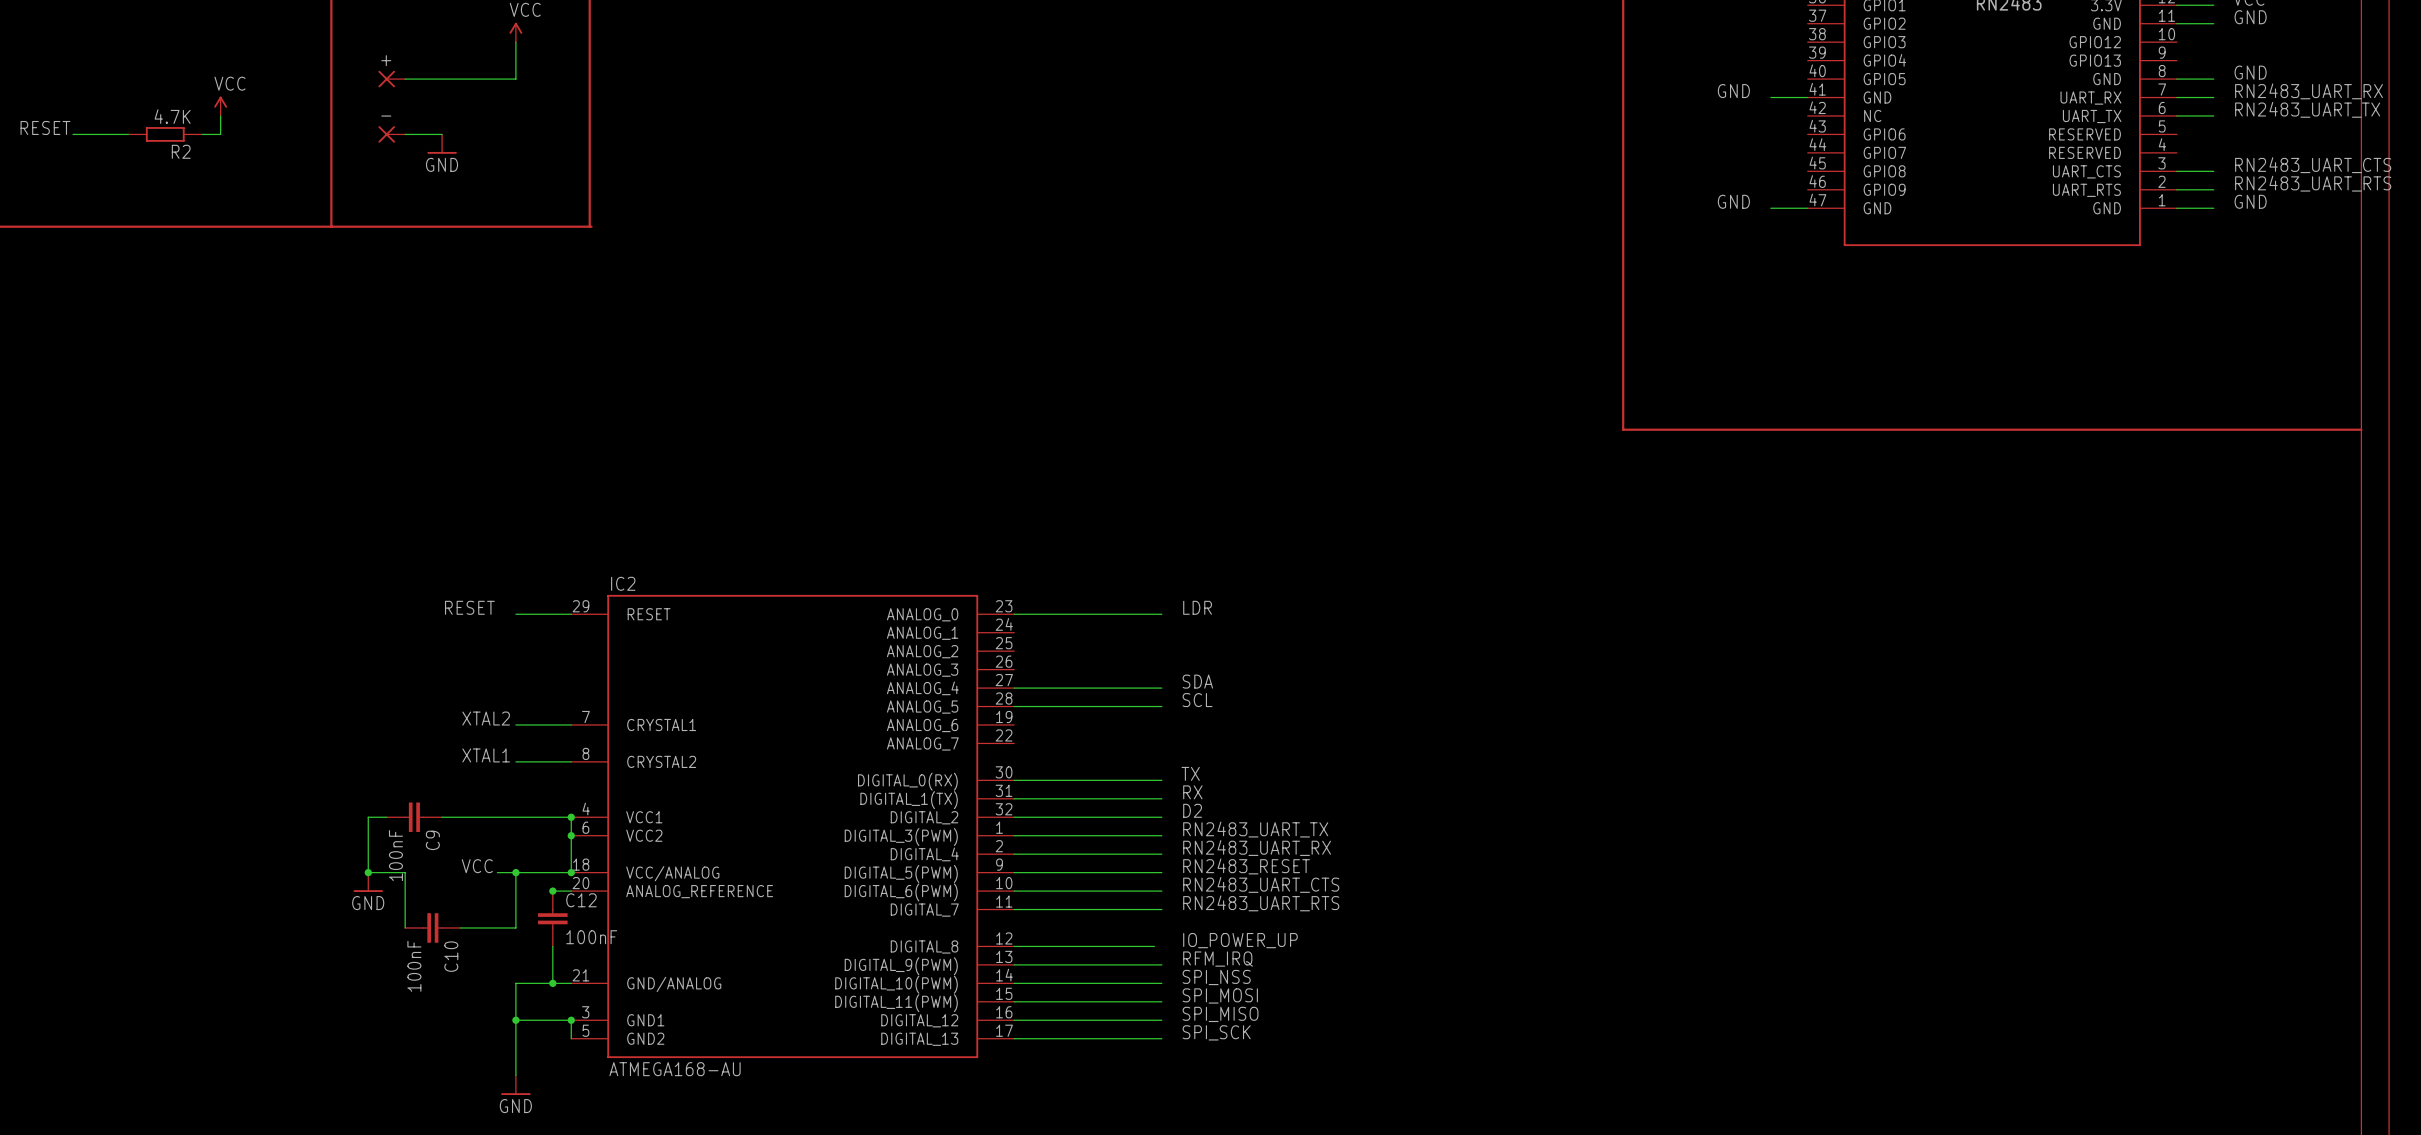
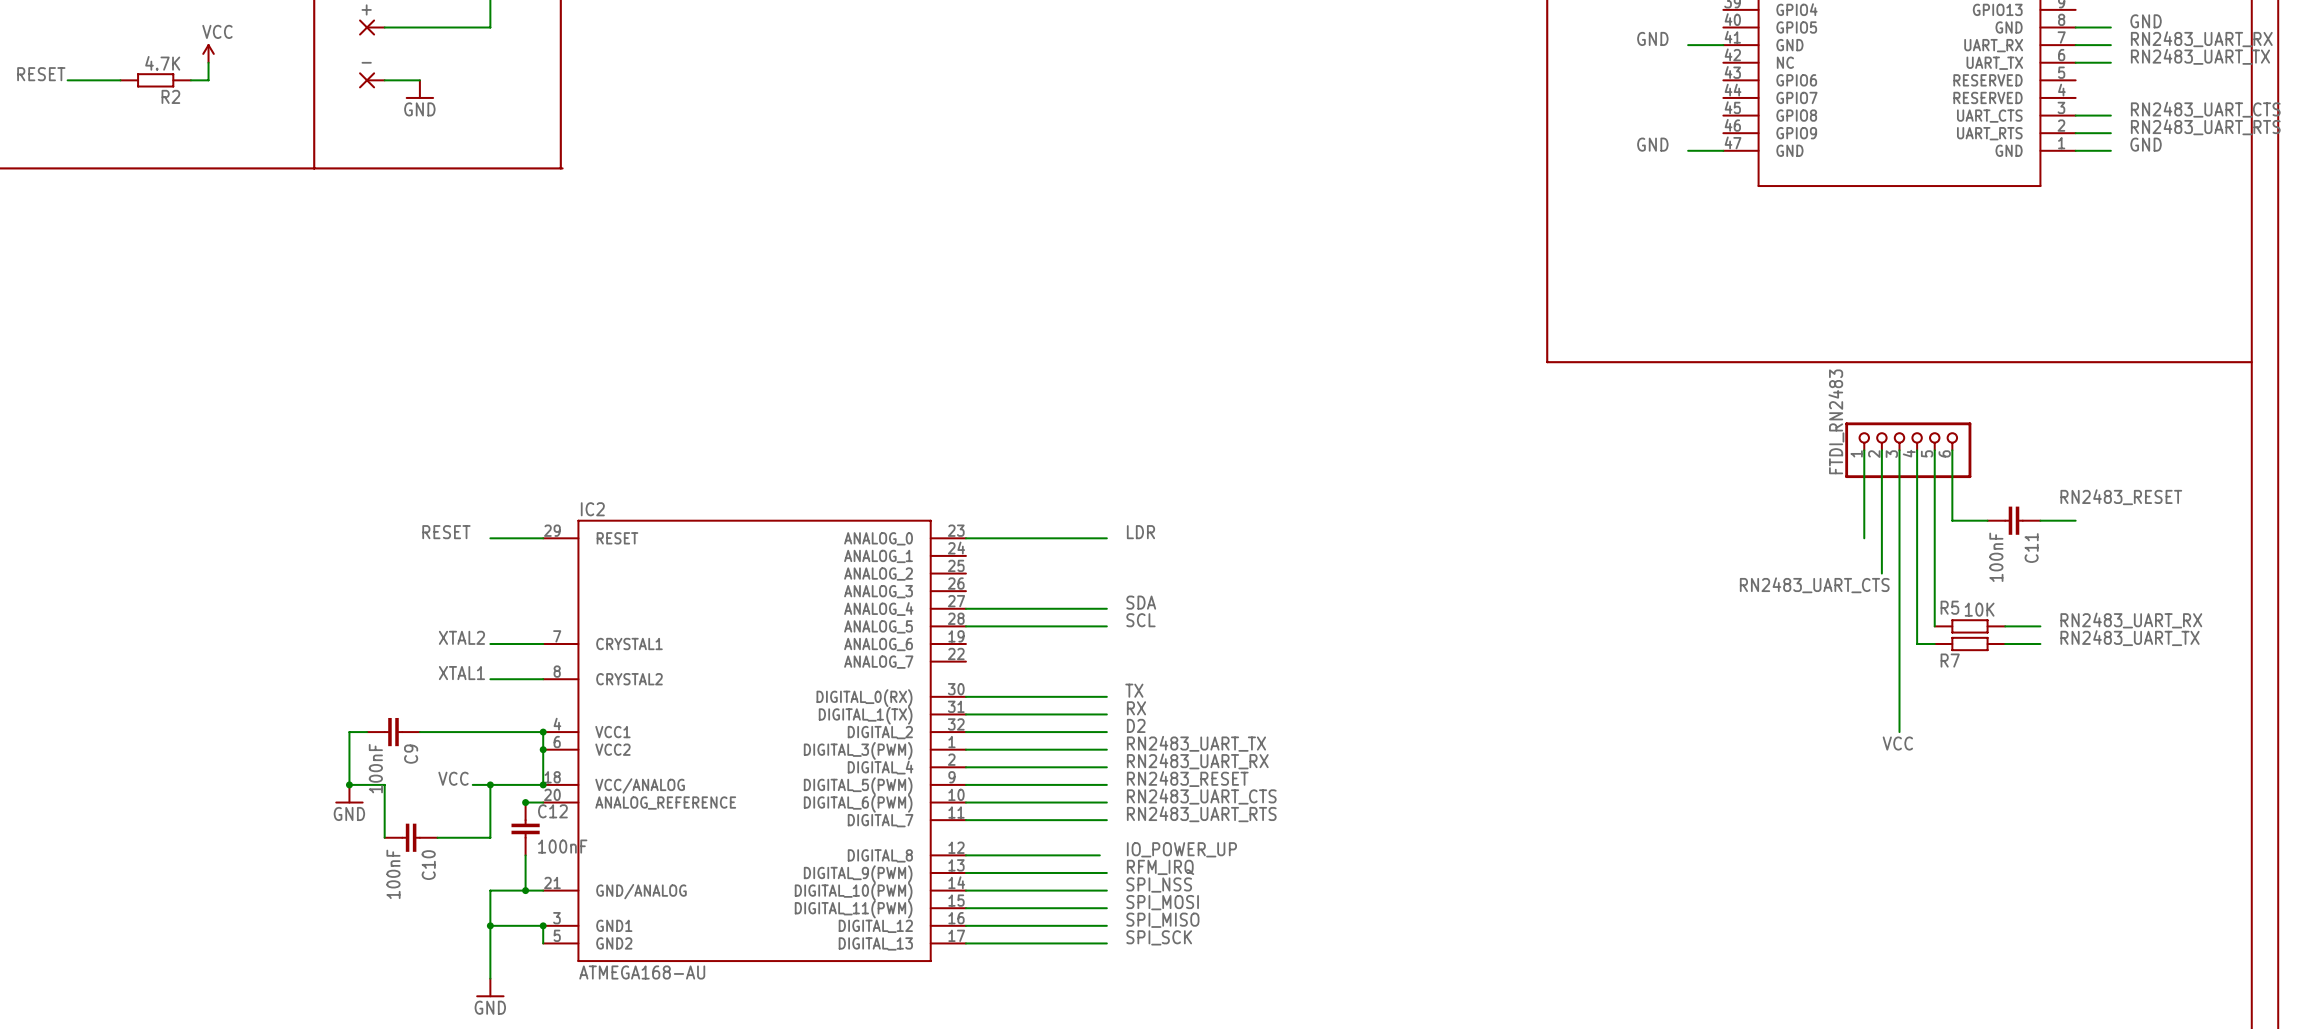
wire: none -> (1864, 450) (1864, 538)
wire: none -> (1881, 450) (1881, 573)
wire: none -> (1899, 450) (1899, 732)
FTDI_RN2483: none -> (1908, 450)
wire: none -> (1917, 450) (1917, 644) (1934, 644)
wire: none -> (1934, 450) (1934, 626)
wire: none -> (1952, 450) (1952, 520) (1987, 520)
label: none -> RN2483_RESET (2121, 497)
C11: none -> 100nF (2013, 520)
wire: none -> (2040, 520) (2075, 520)
label: none -> RN2483_UART_CTS (1814, 585)
label: none -> RN2483_UART_RX (2131, 620)
R5: none -> 10K (1969, 626)
wire: none -> (2005, 626) (2040, 626)
label: none -> RN2483_UART_TX (2130, 638)
R7: none -> (1969, 644)
wire: none -> (2005, 644) (2040, 644)
label: none -> VCC (1897, 743)

